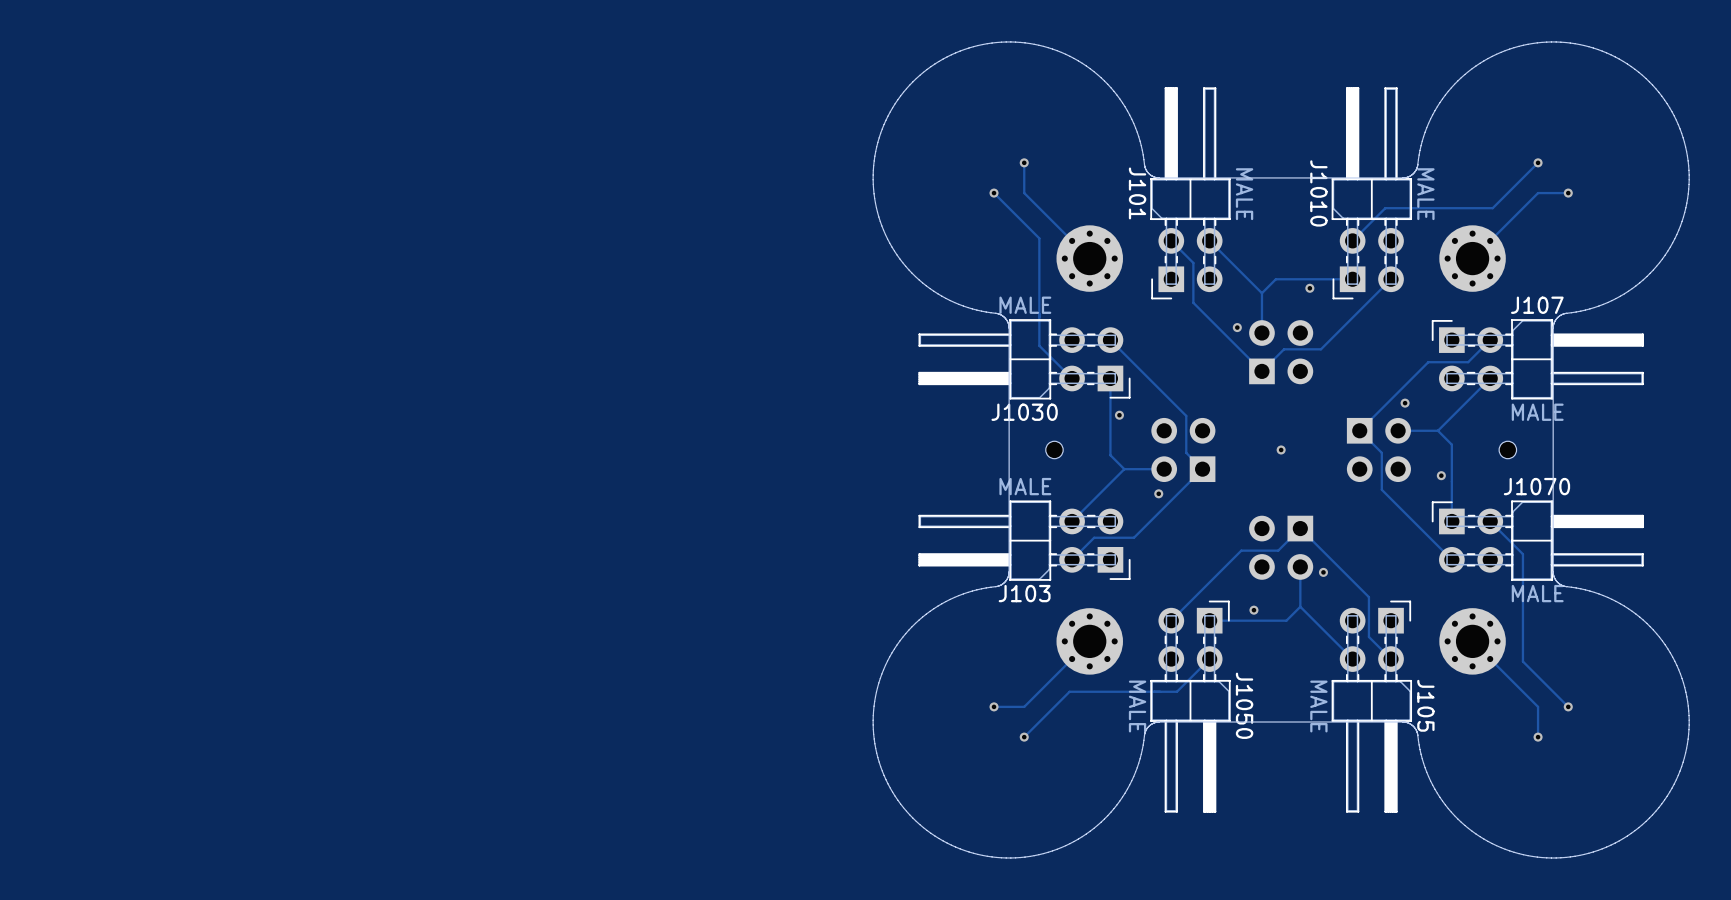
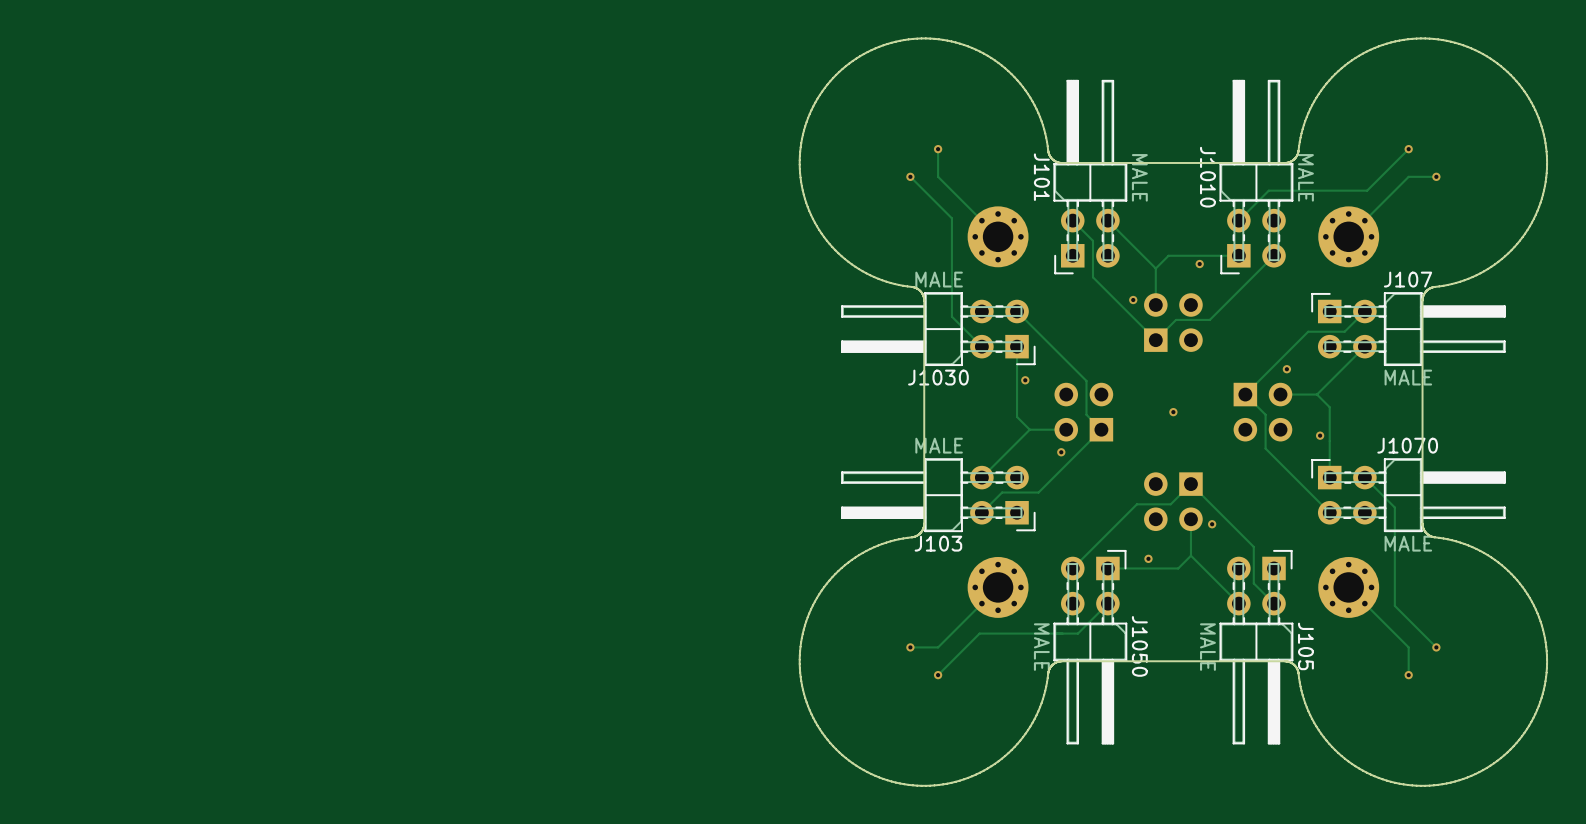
part: (1054, 449) -> none
part: (1507, 449) -> none

